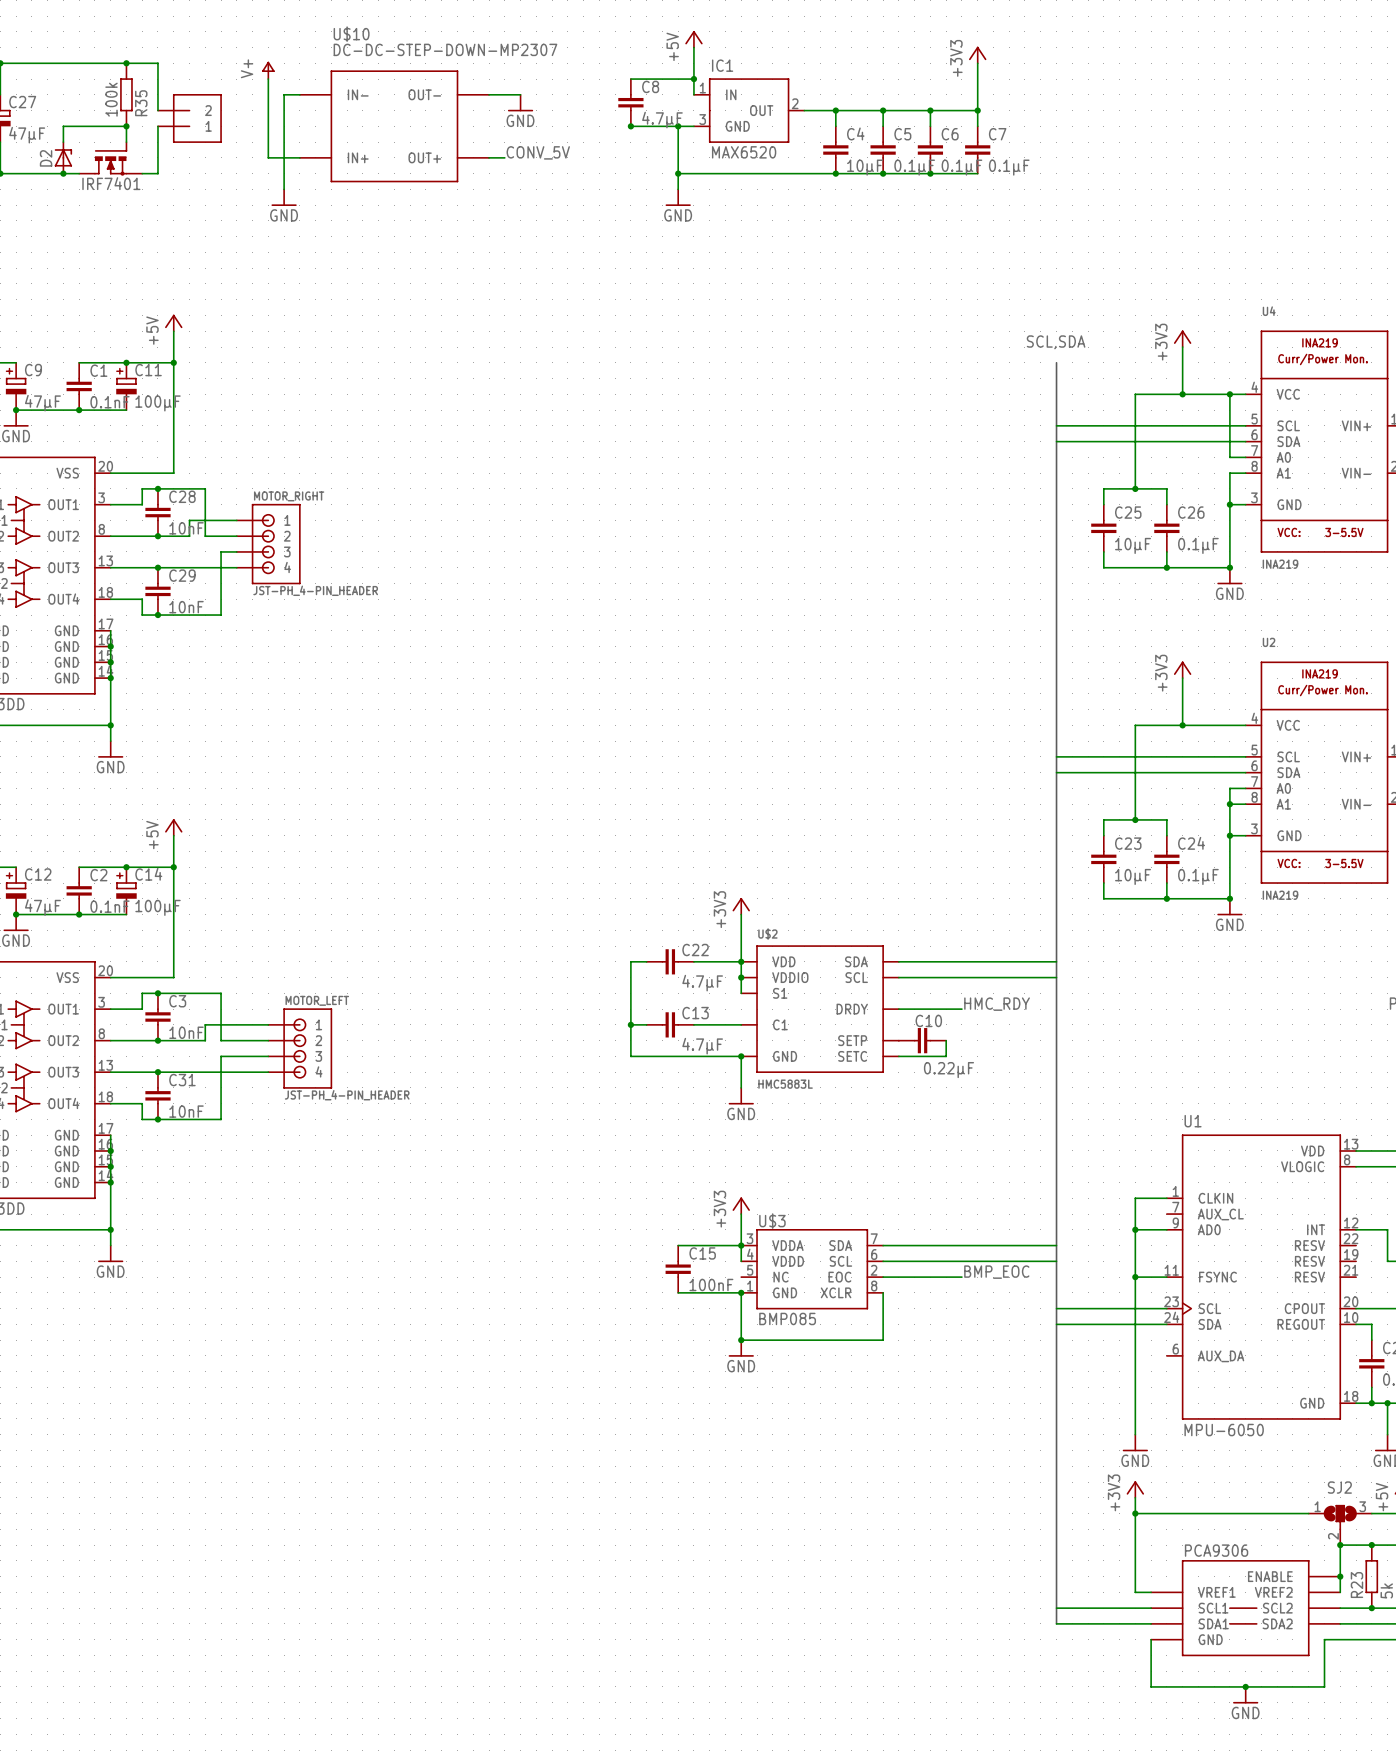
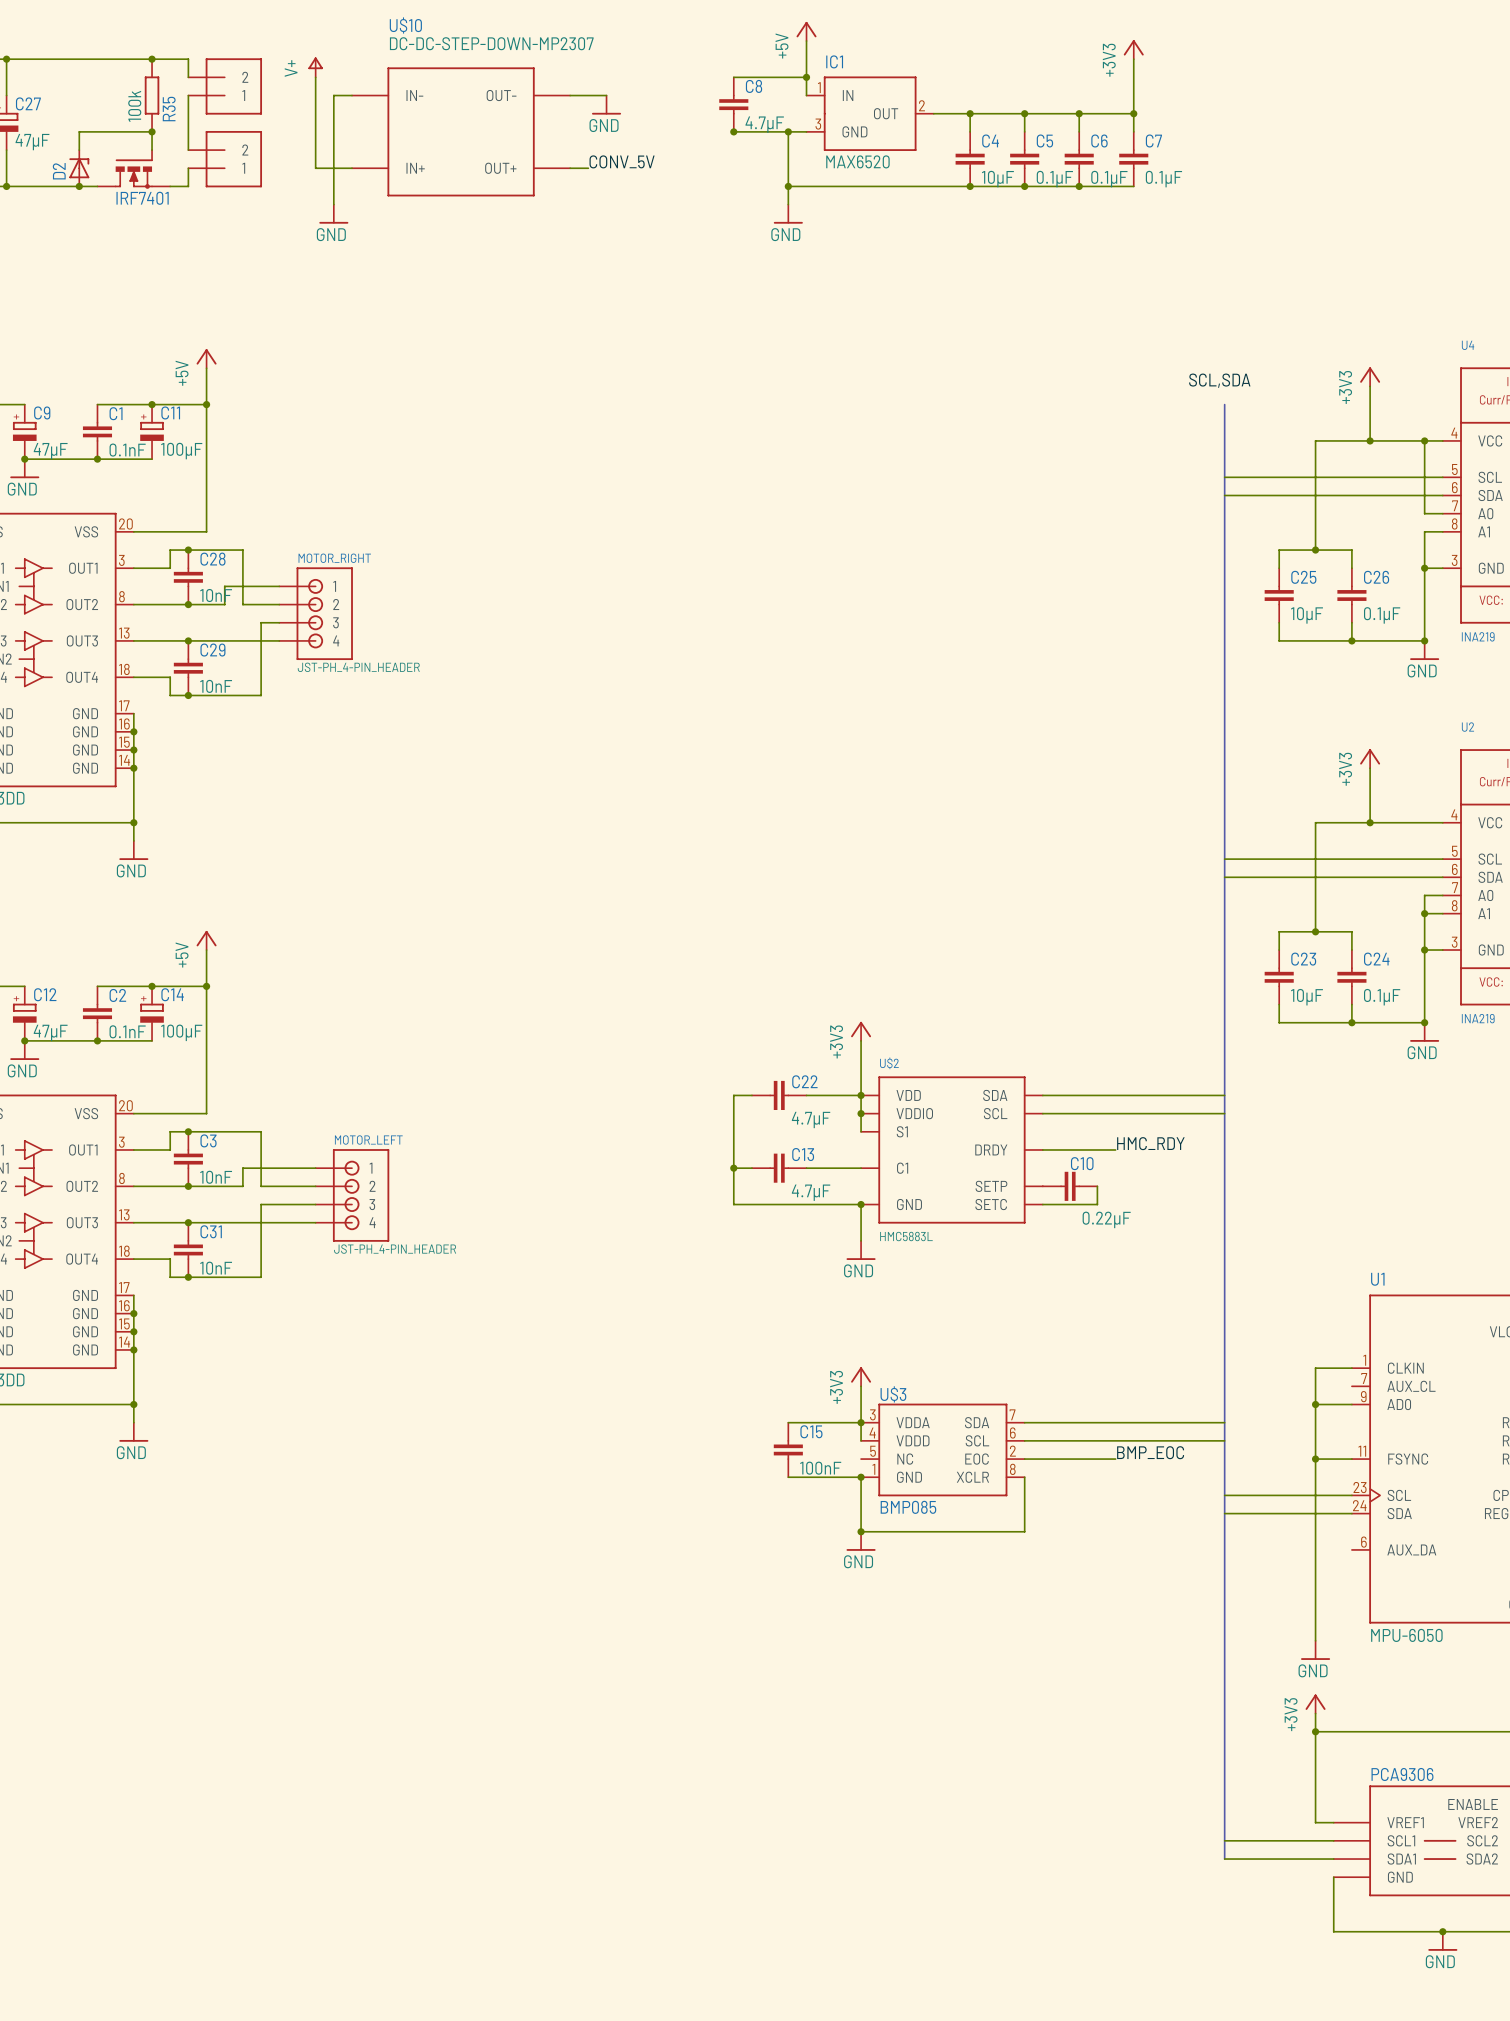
wire: (157, 79) (157, 94) -> (188, 113) (188, 131)
part: none -> (225, 86)
part: (189, 118) -> none
wire: (157, 142) (157, 157) -> none
part: none -> (225, 159)

